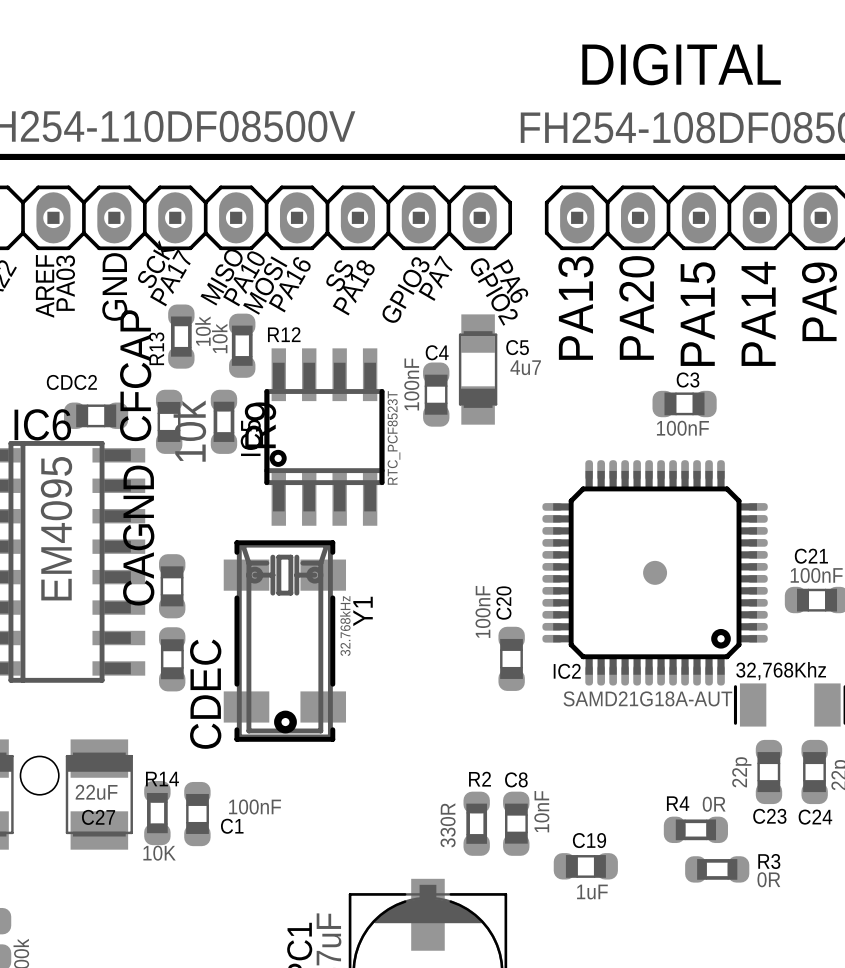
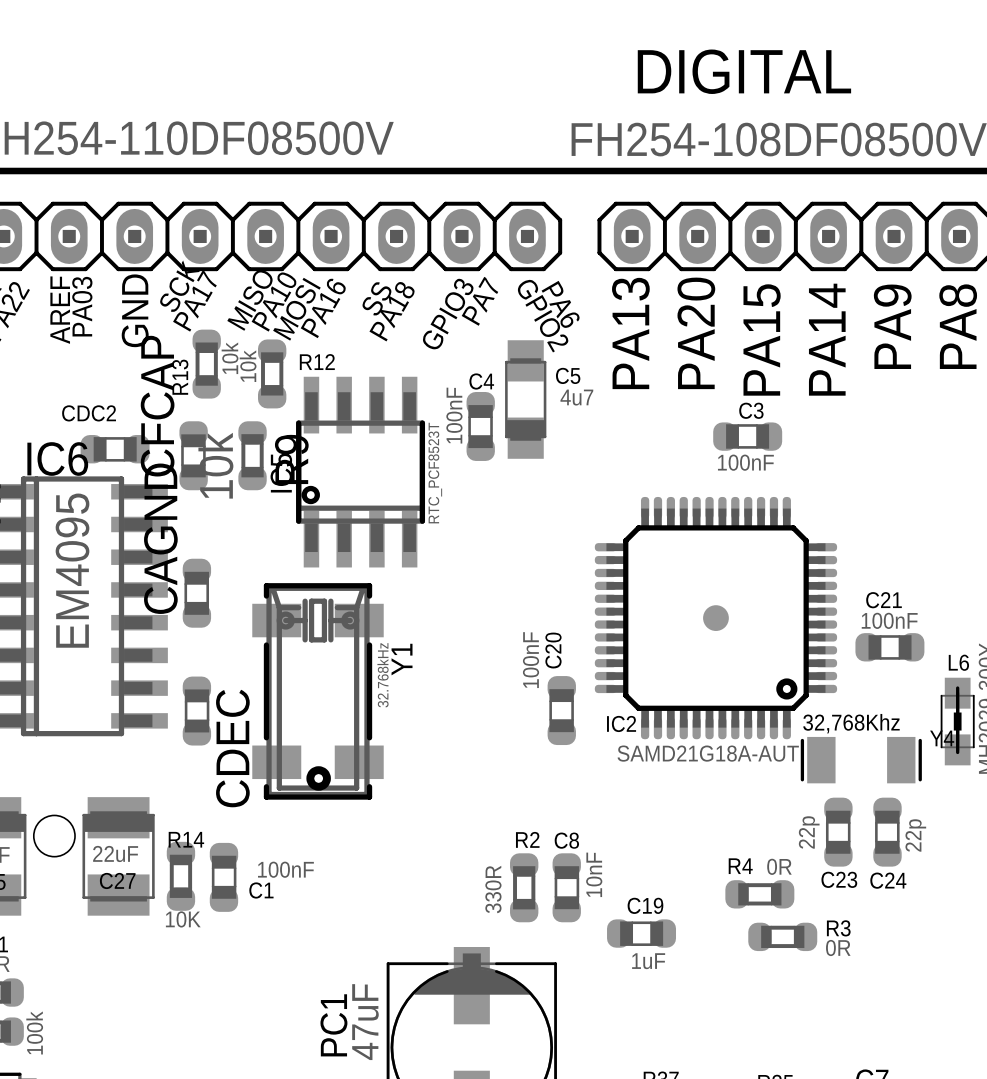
CAGND position: (172, 586) -> (196, 593)

